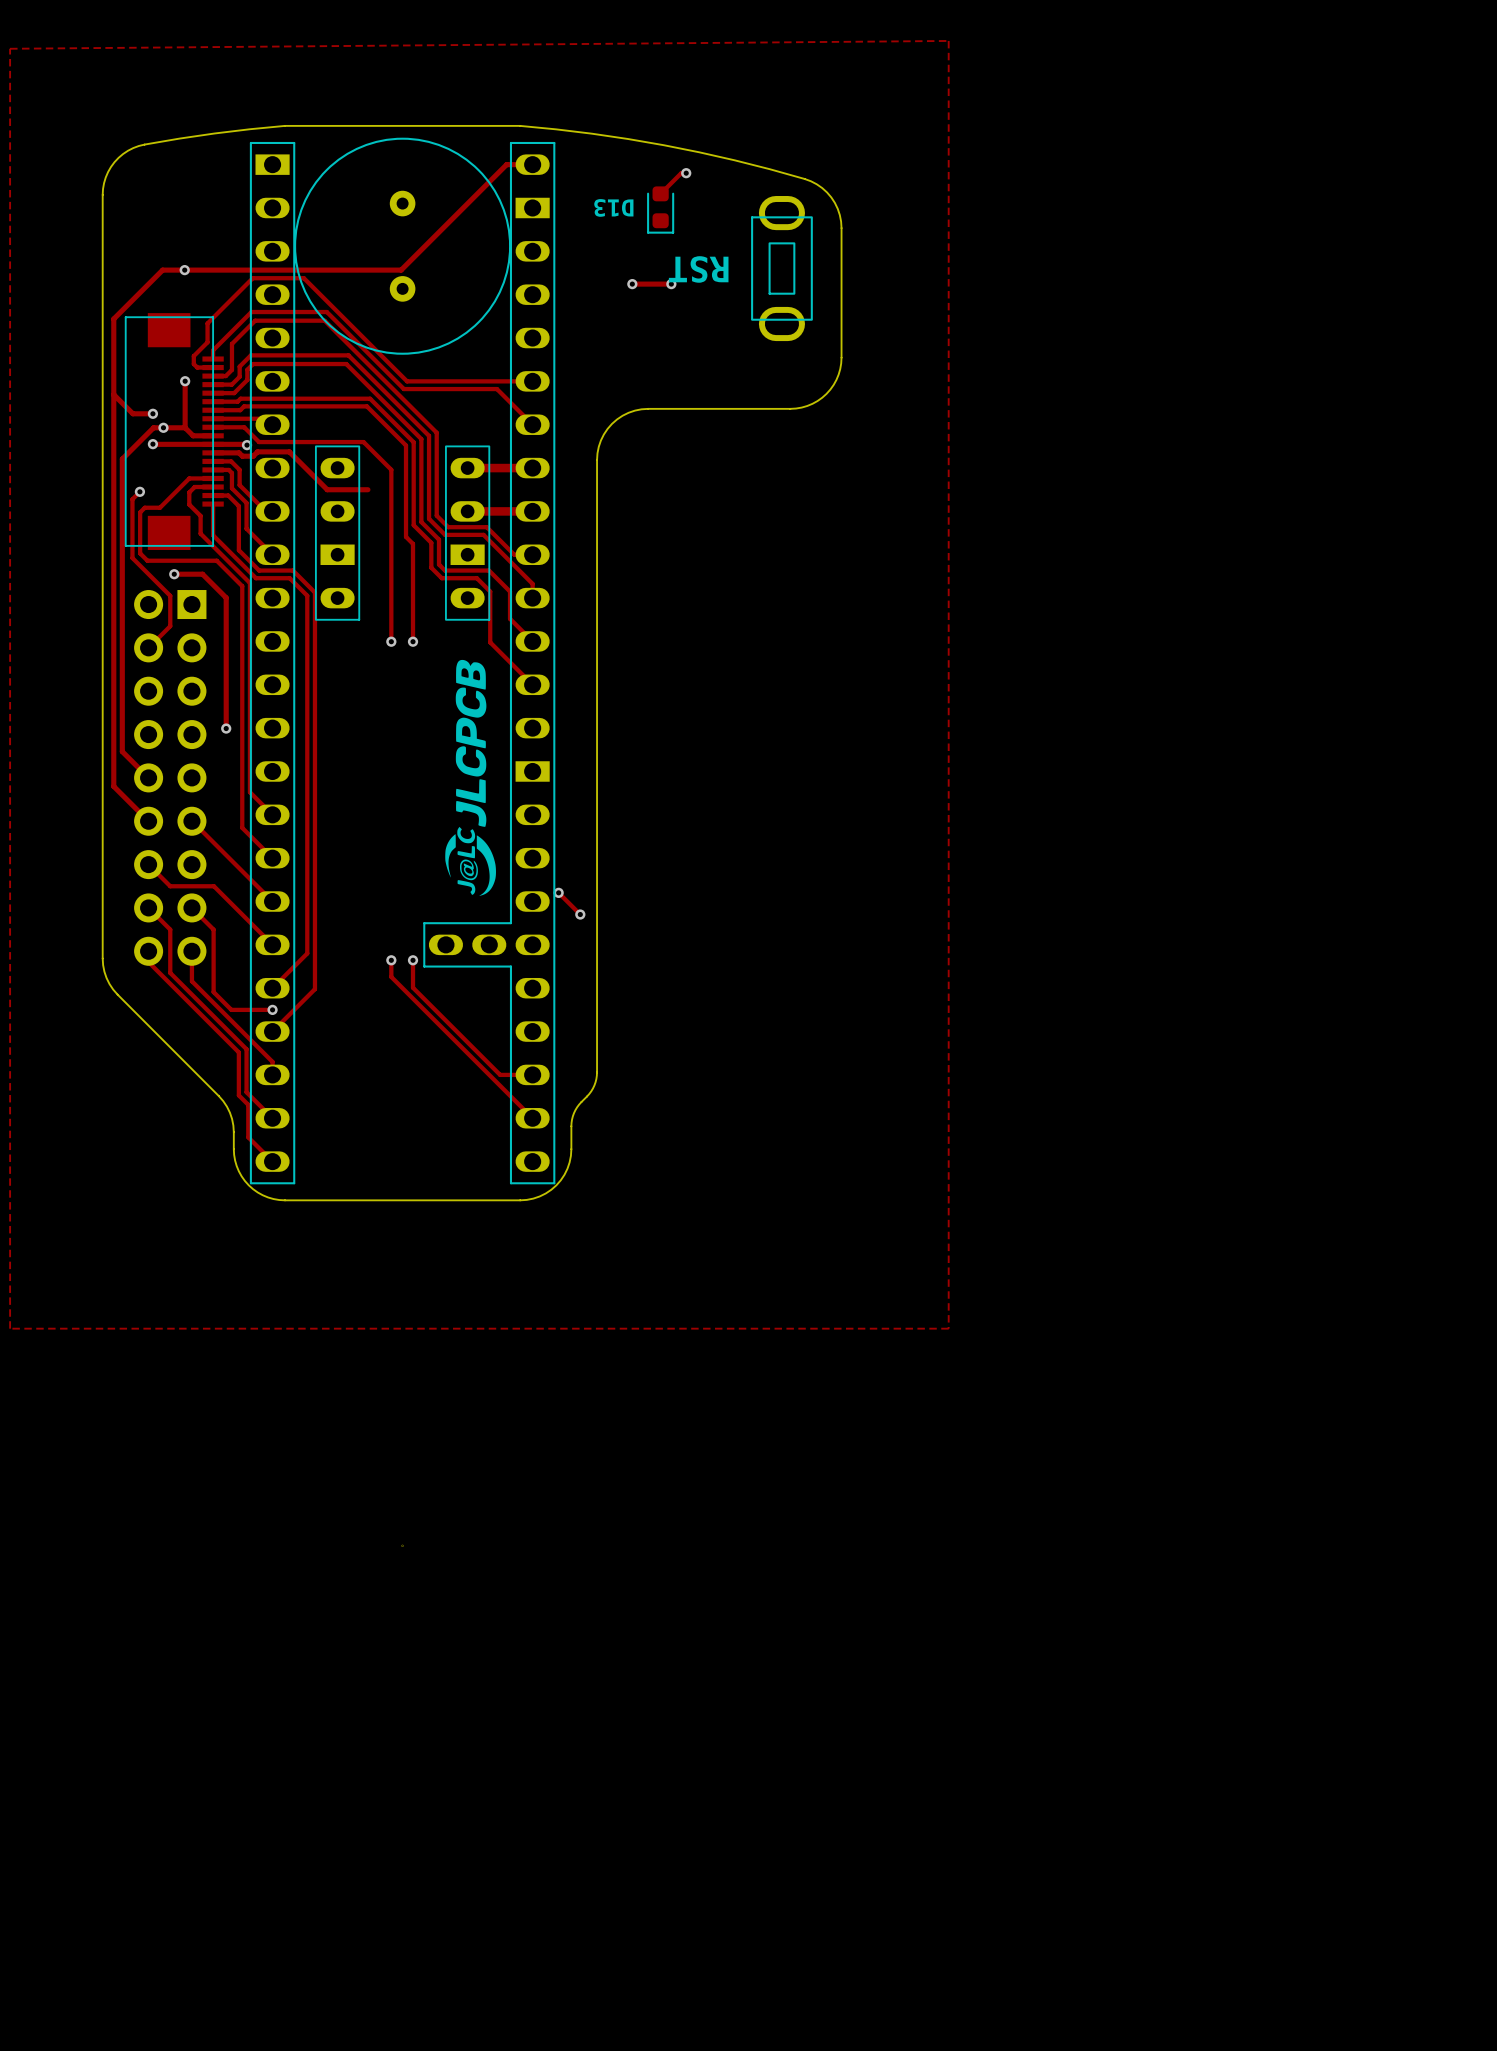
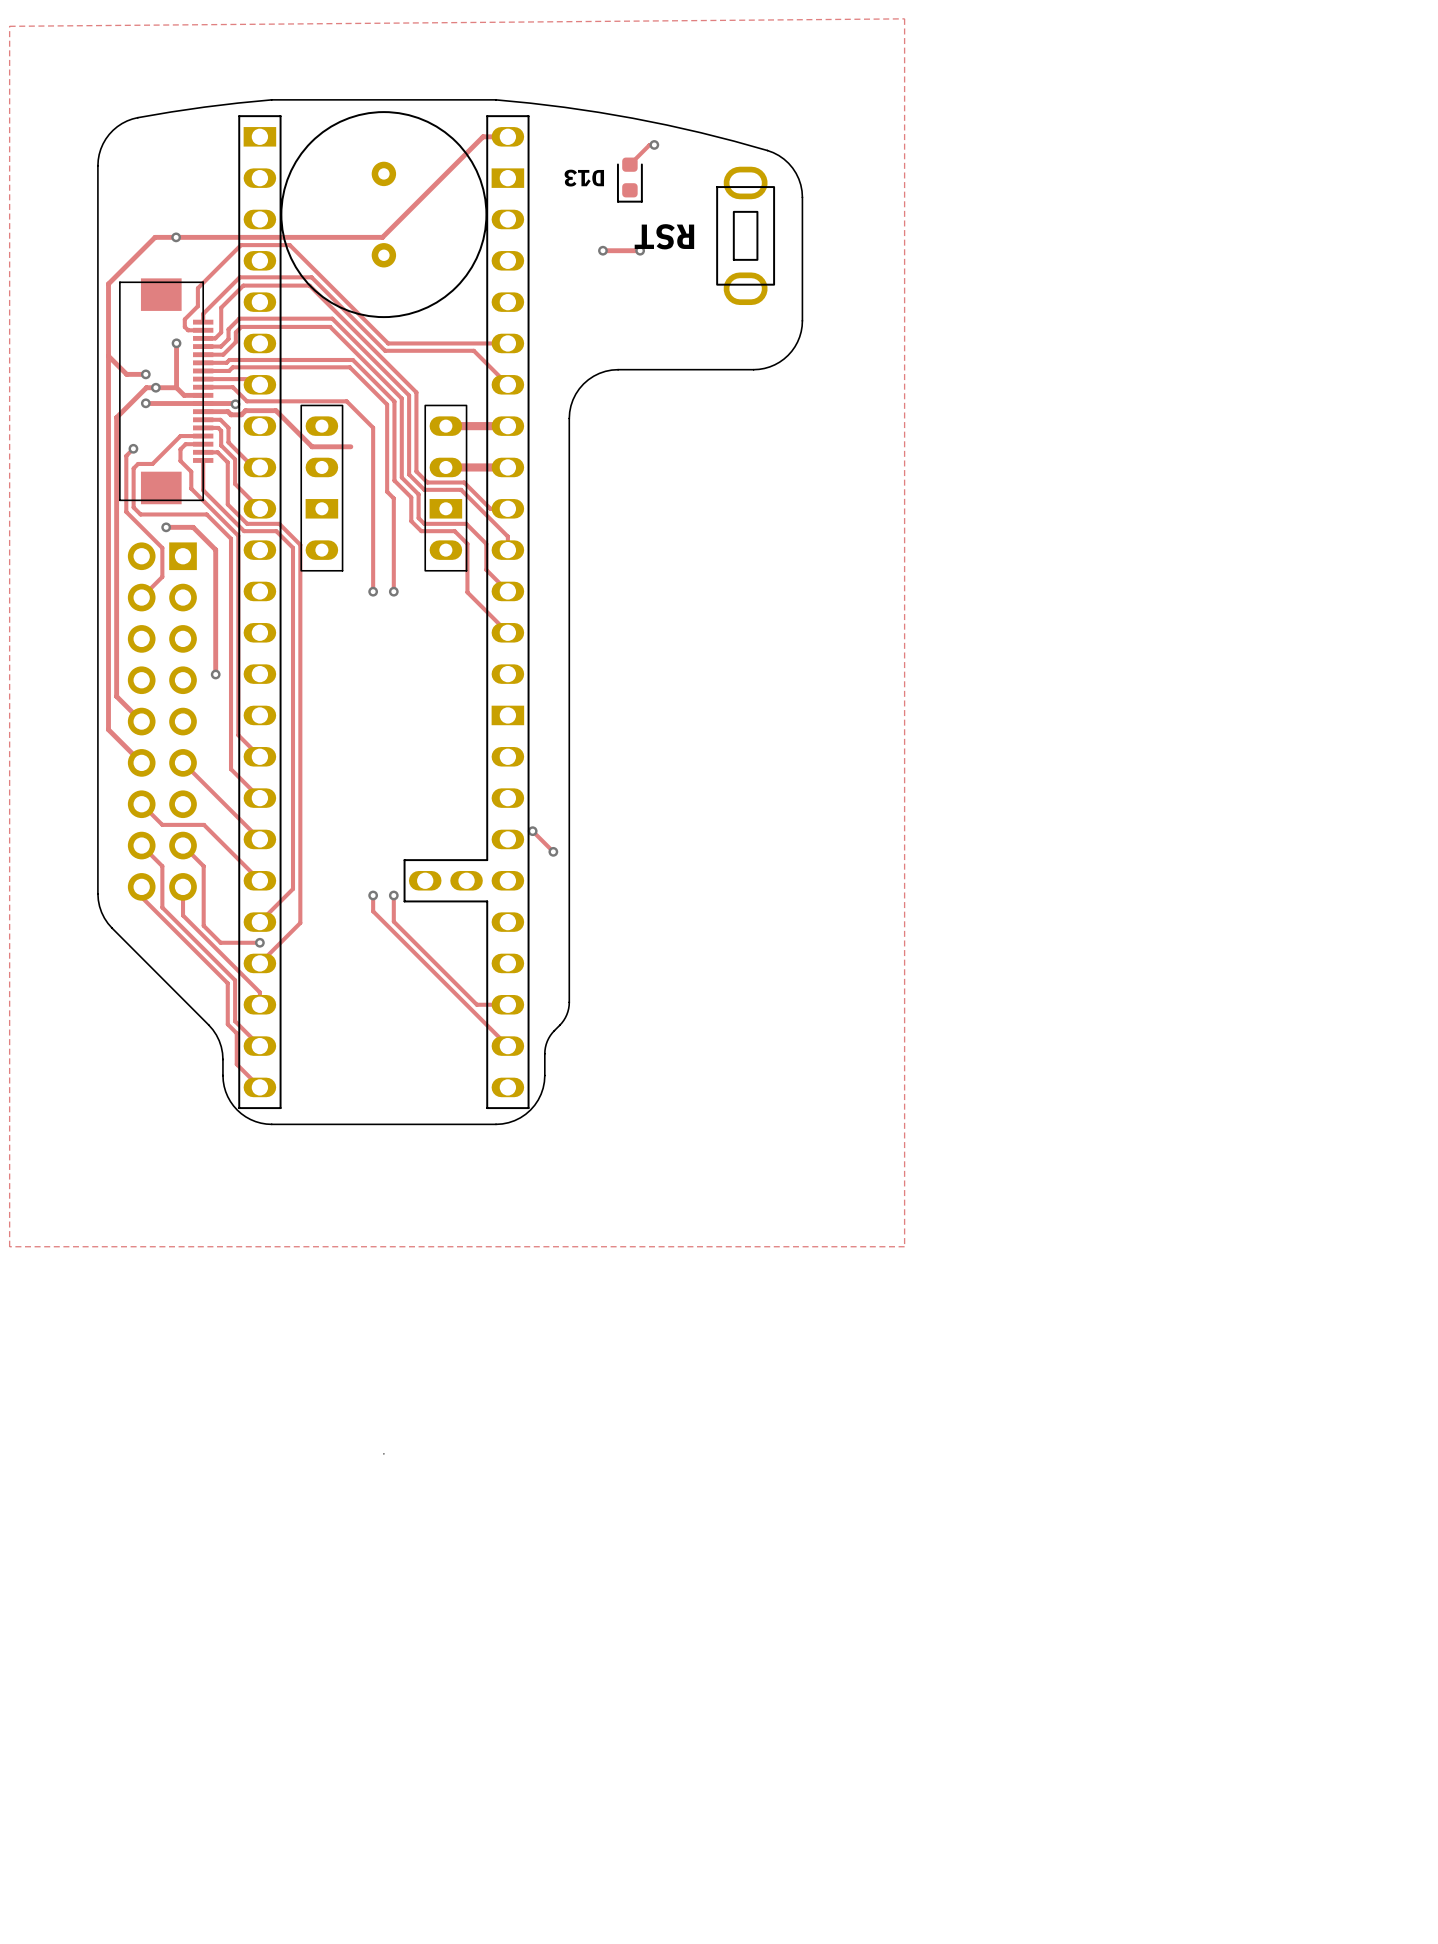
drawing: [445, 659, 496, 896] -> none

